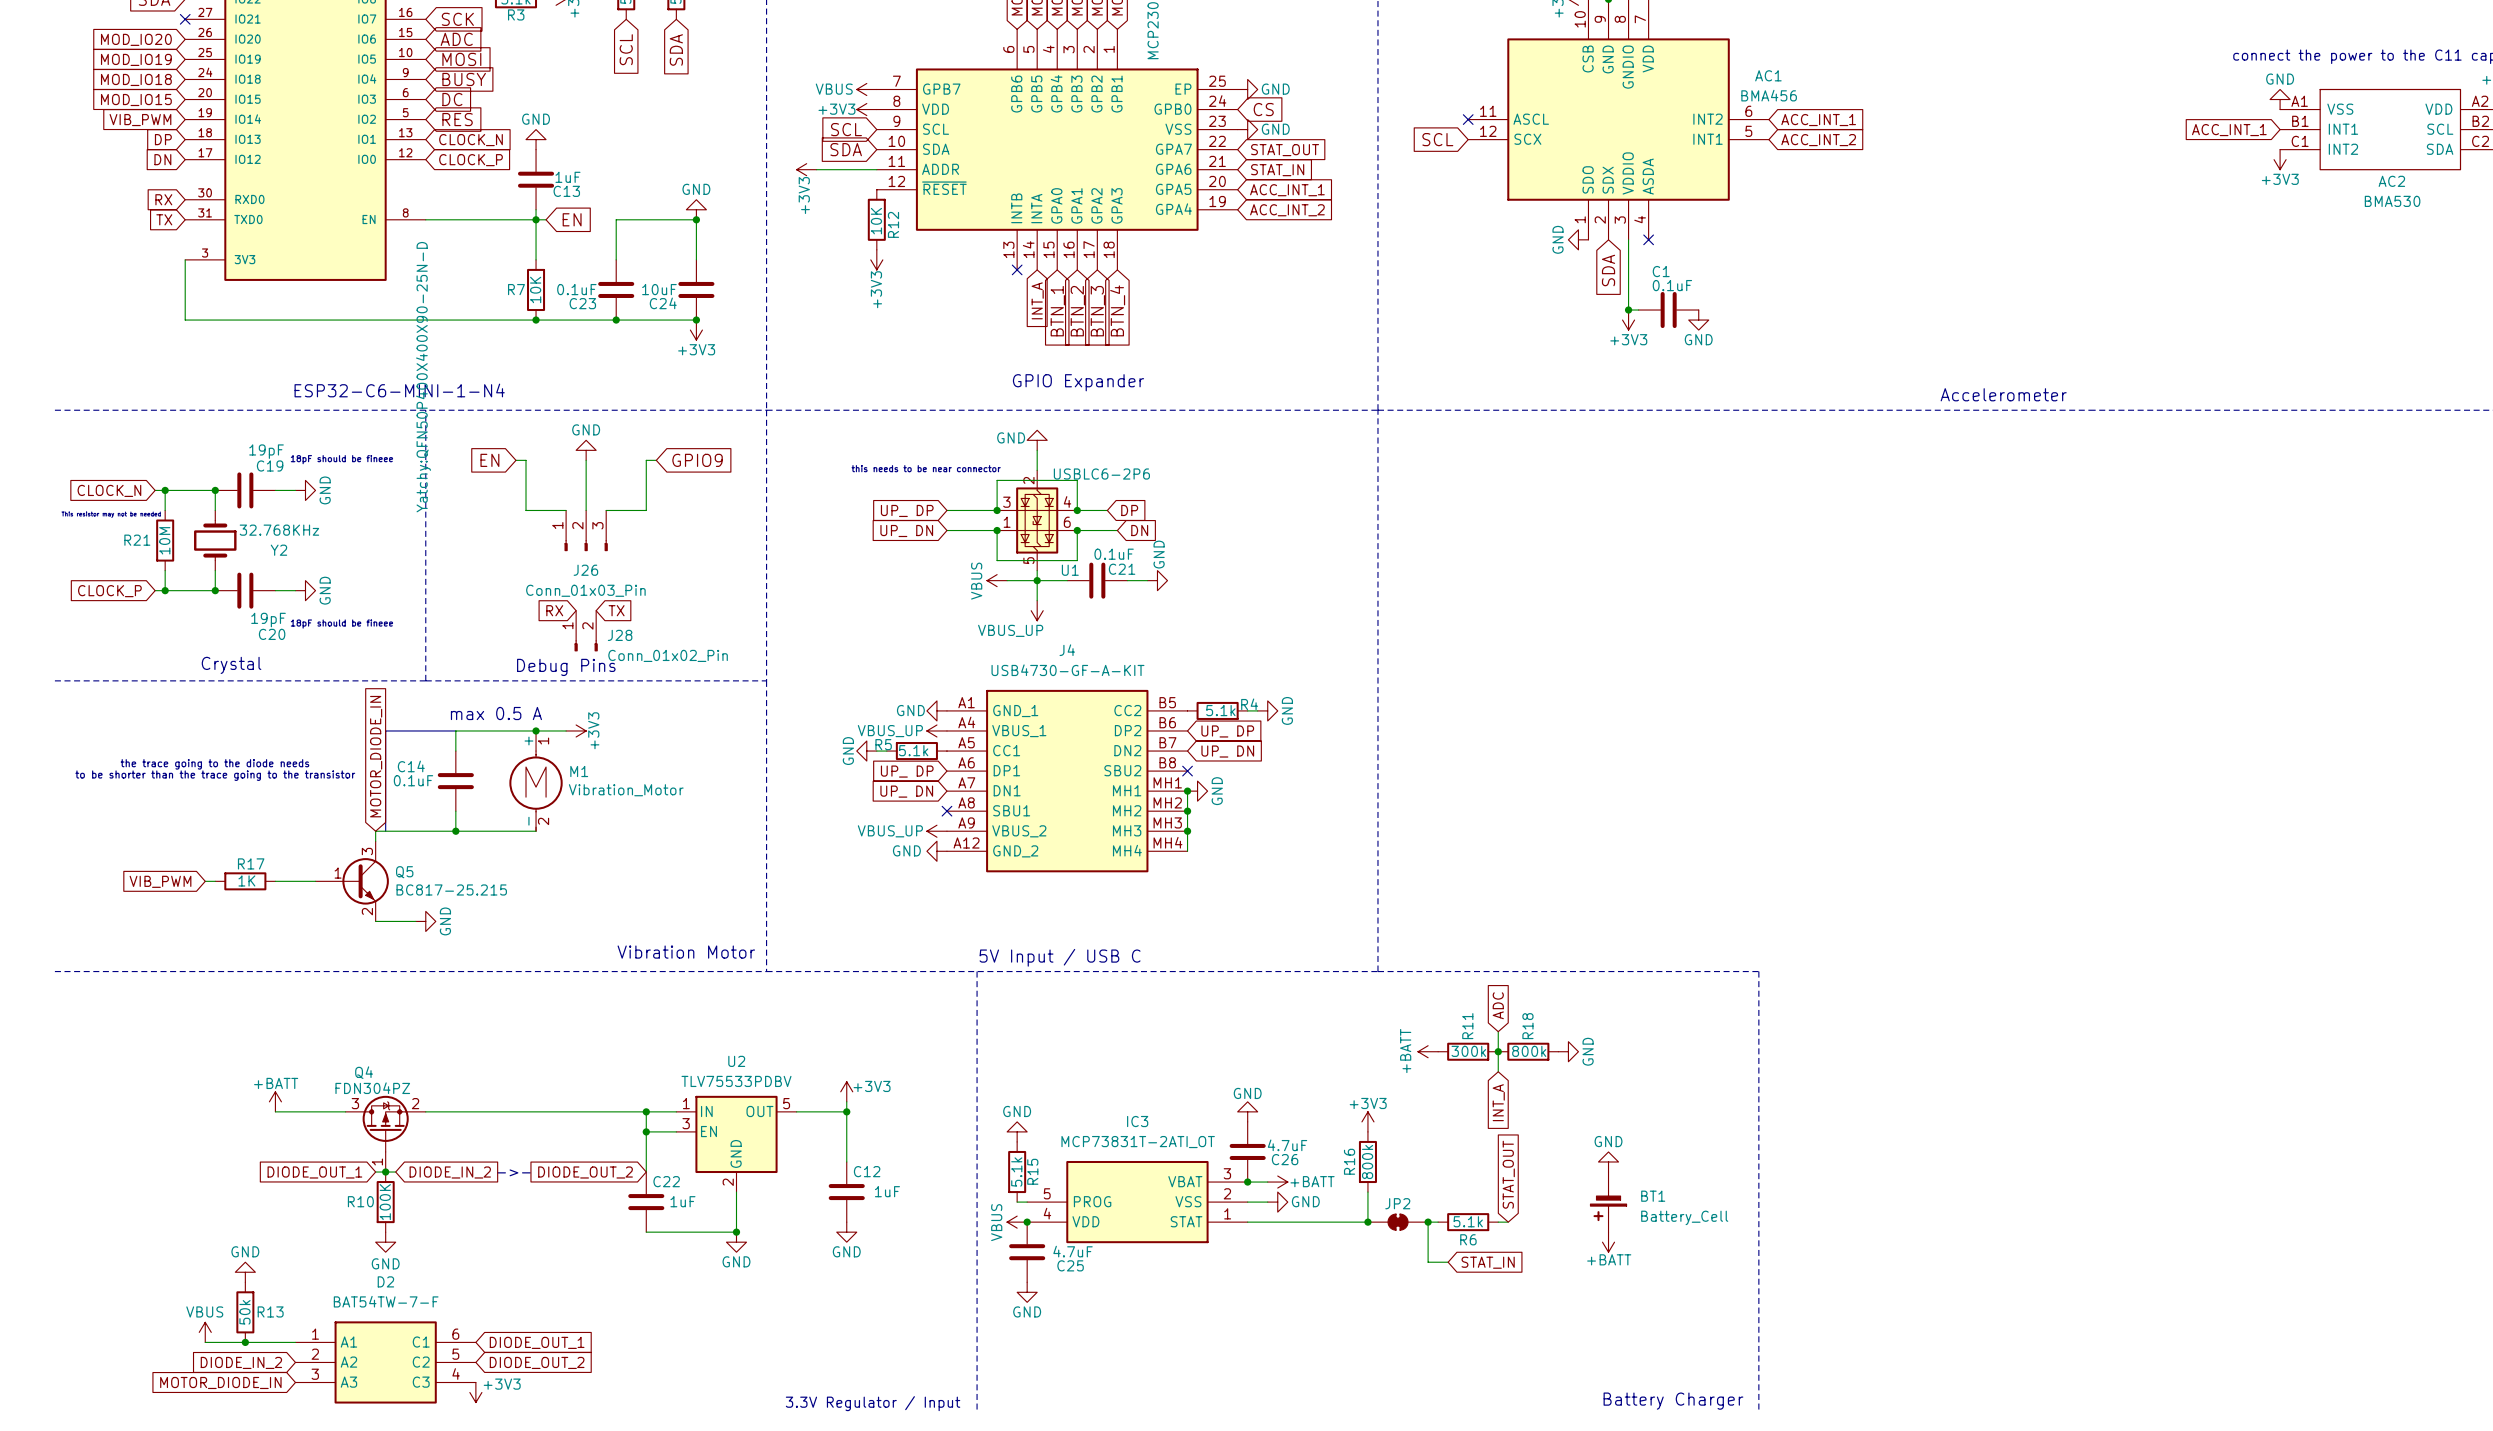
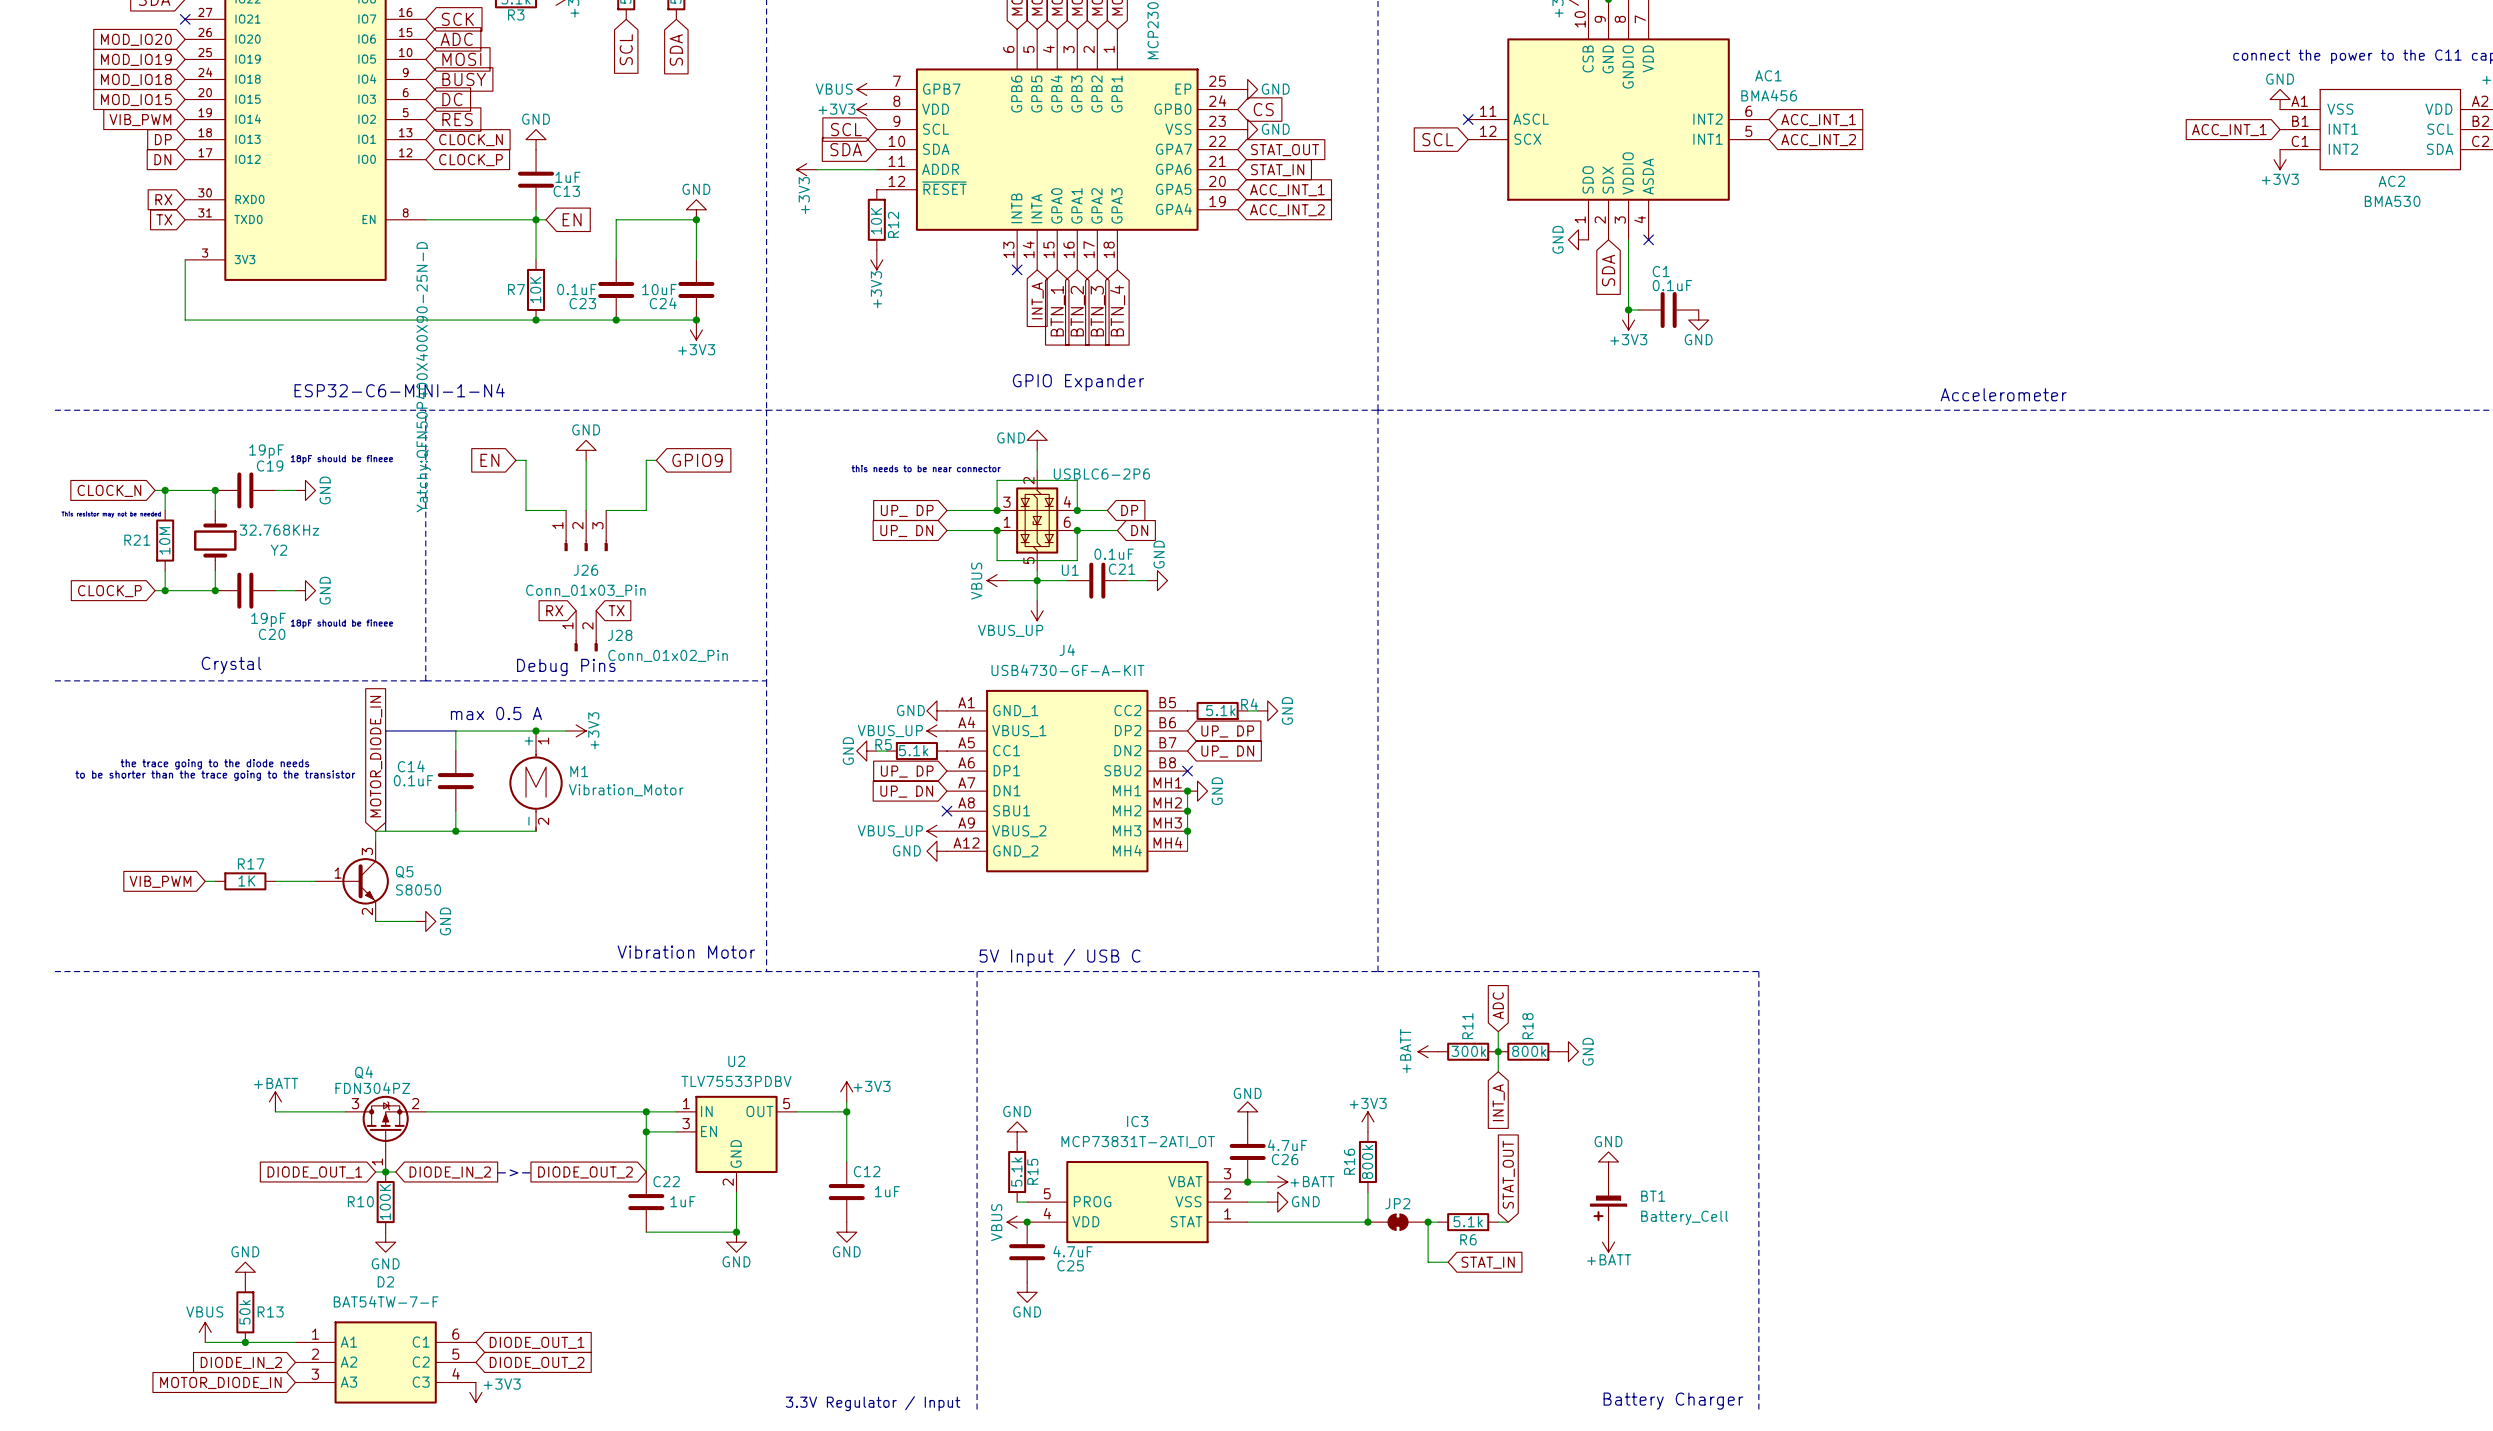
Q5 value: BC817-25.215 (451, 889) -> S8050 (418, 889)

